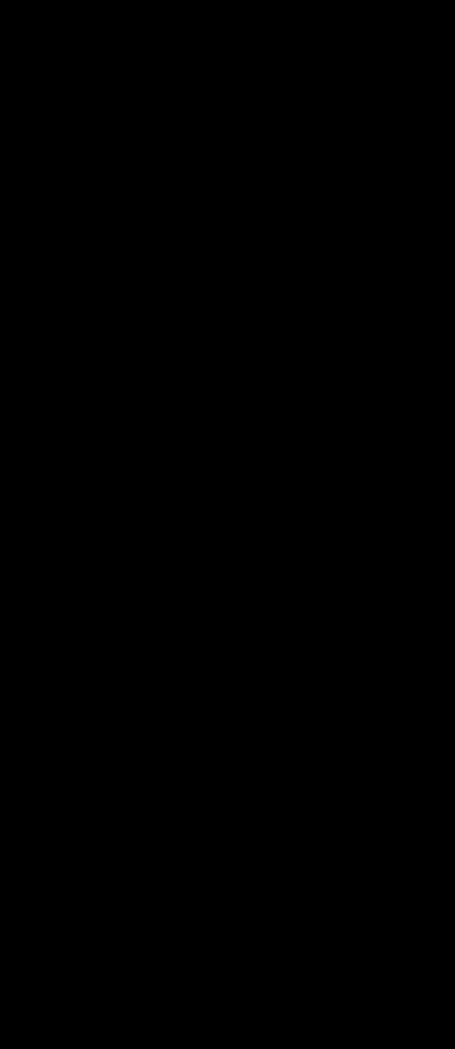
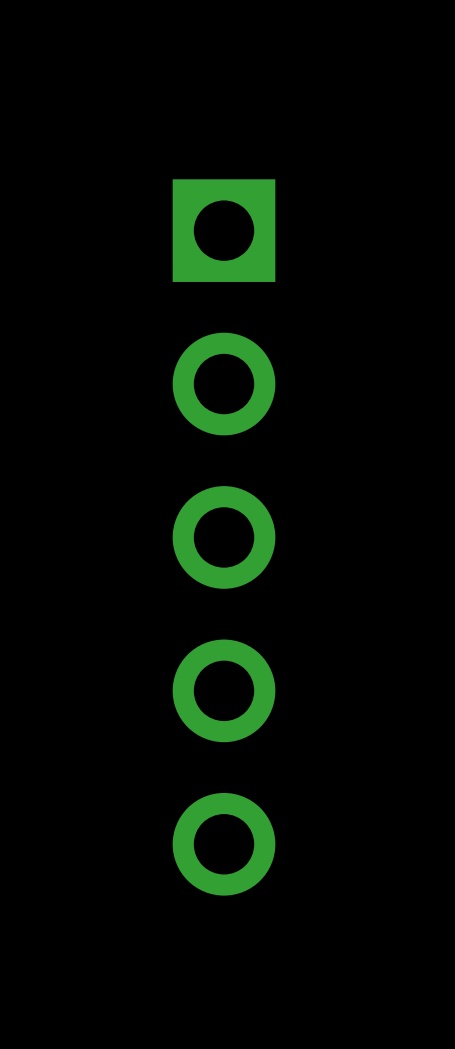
part: none -> (224, 537)

